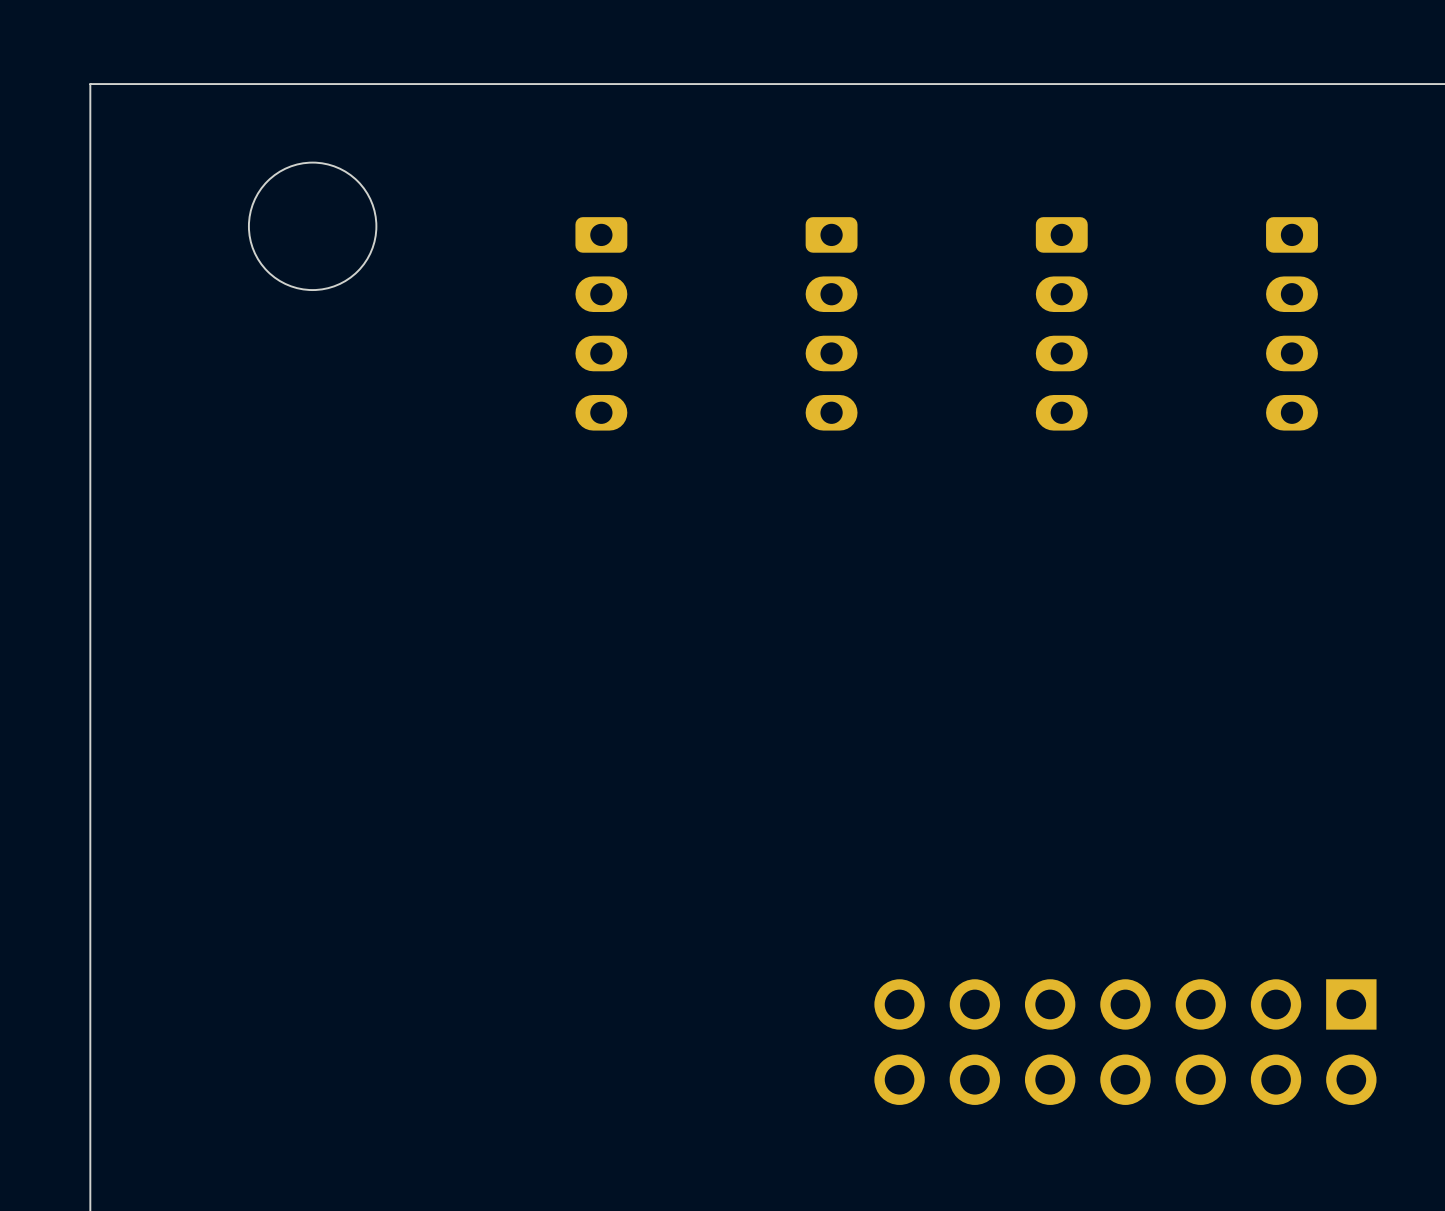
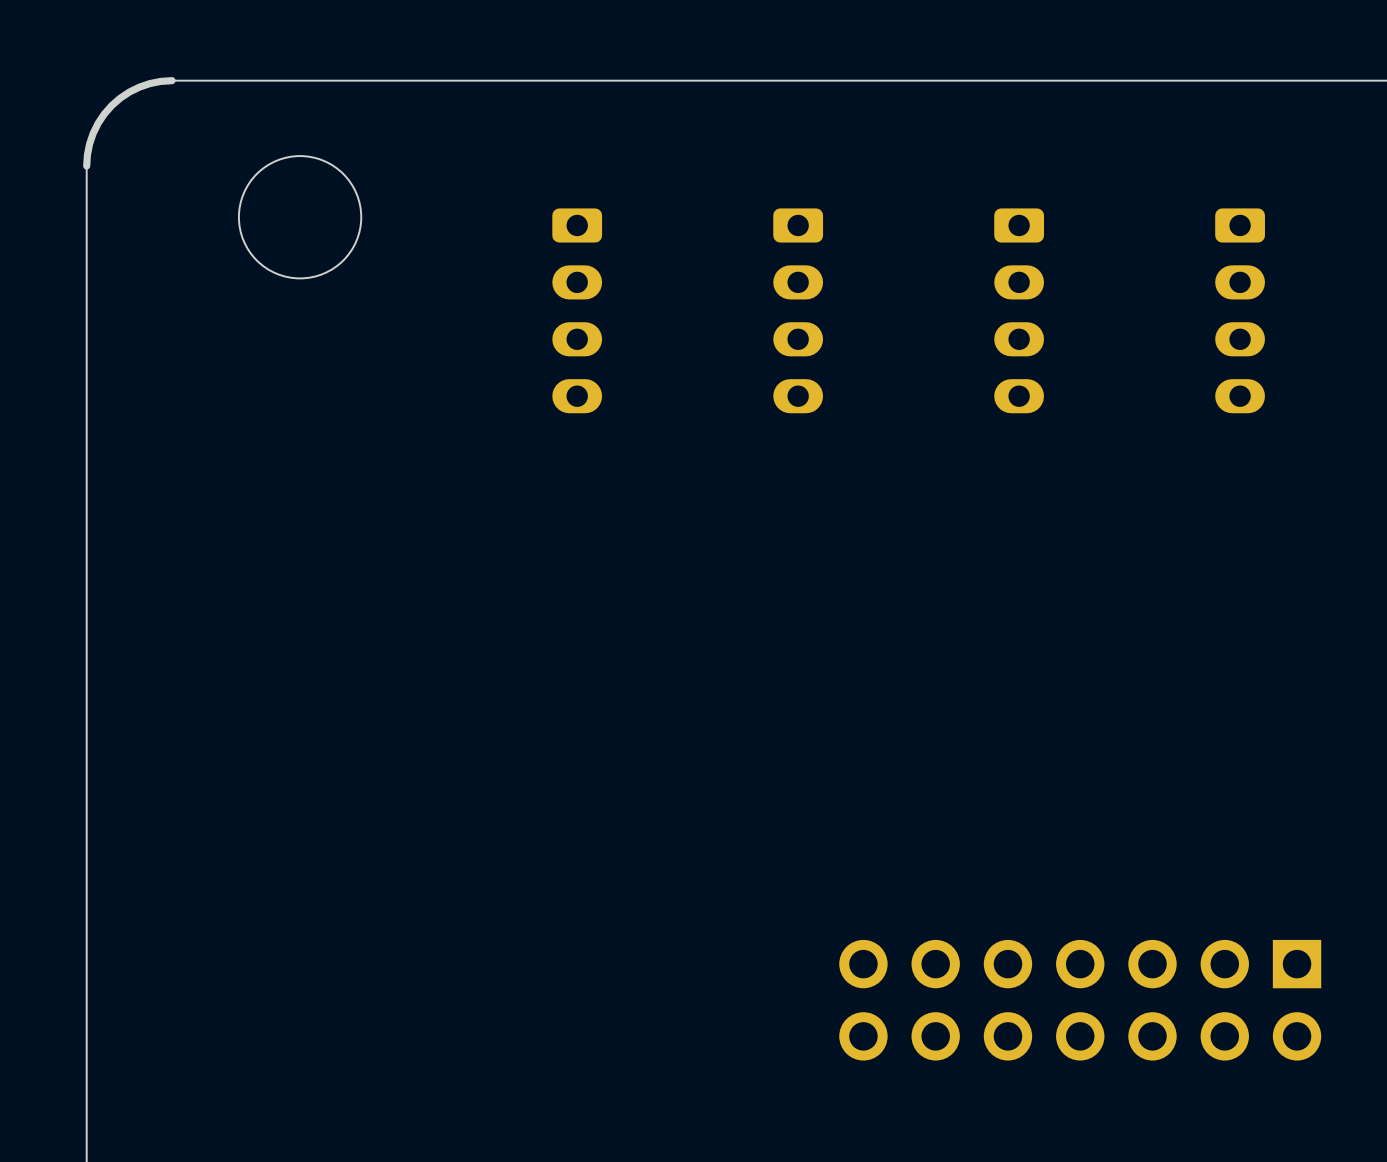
board edge: (179, 84) (90, 84) (90, 172) -> (172, 80) (139, 87) (111, 105) (93, 133) (86, 166)

